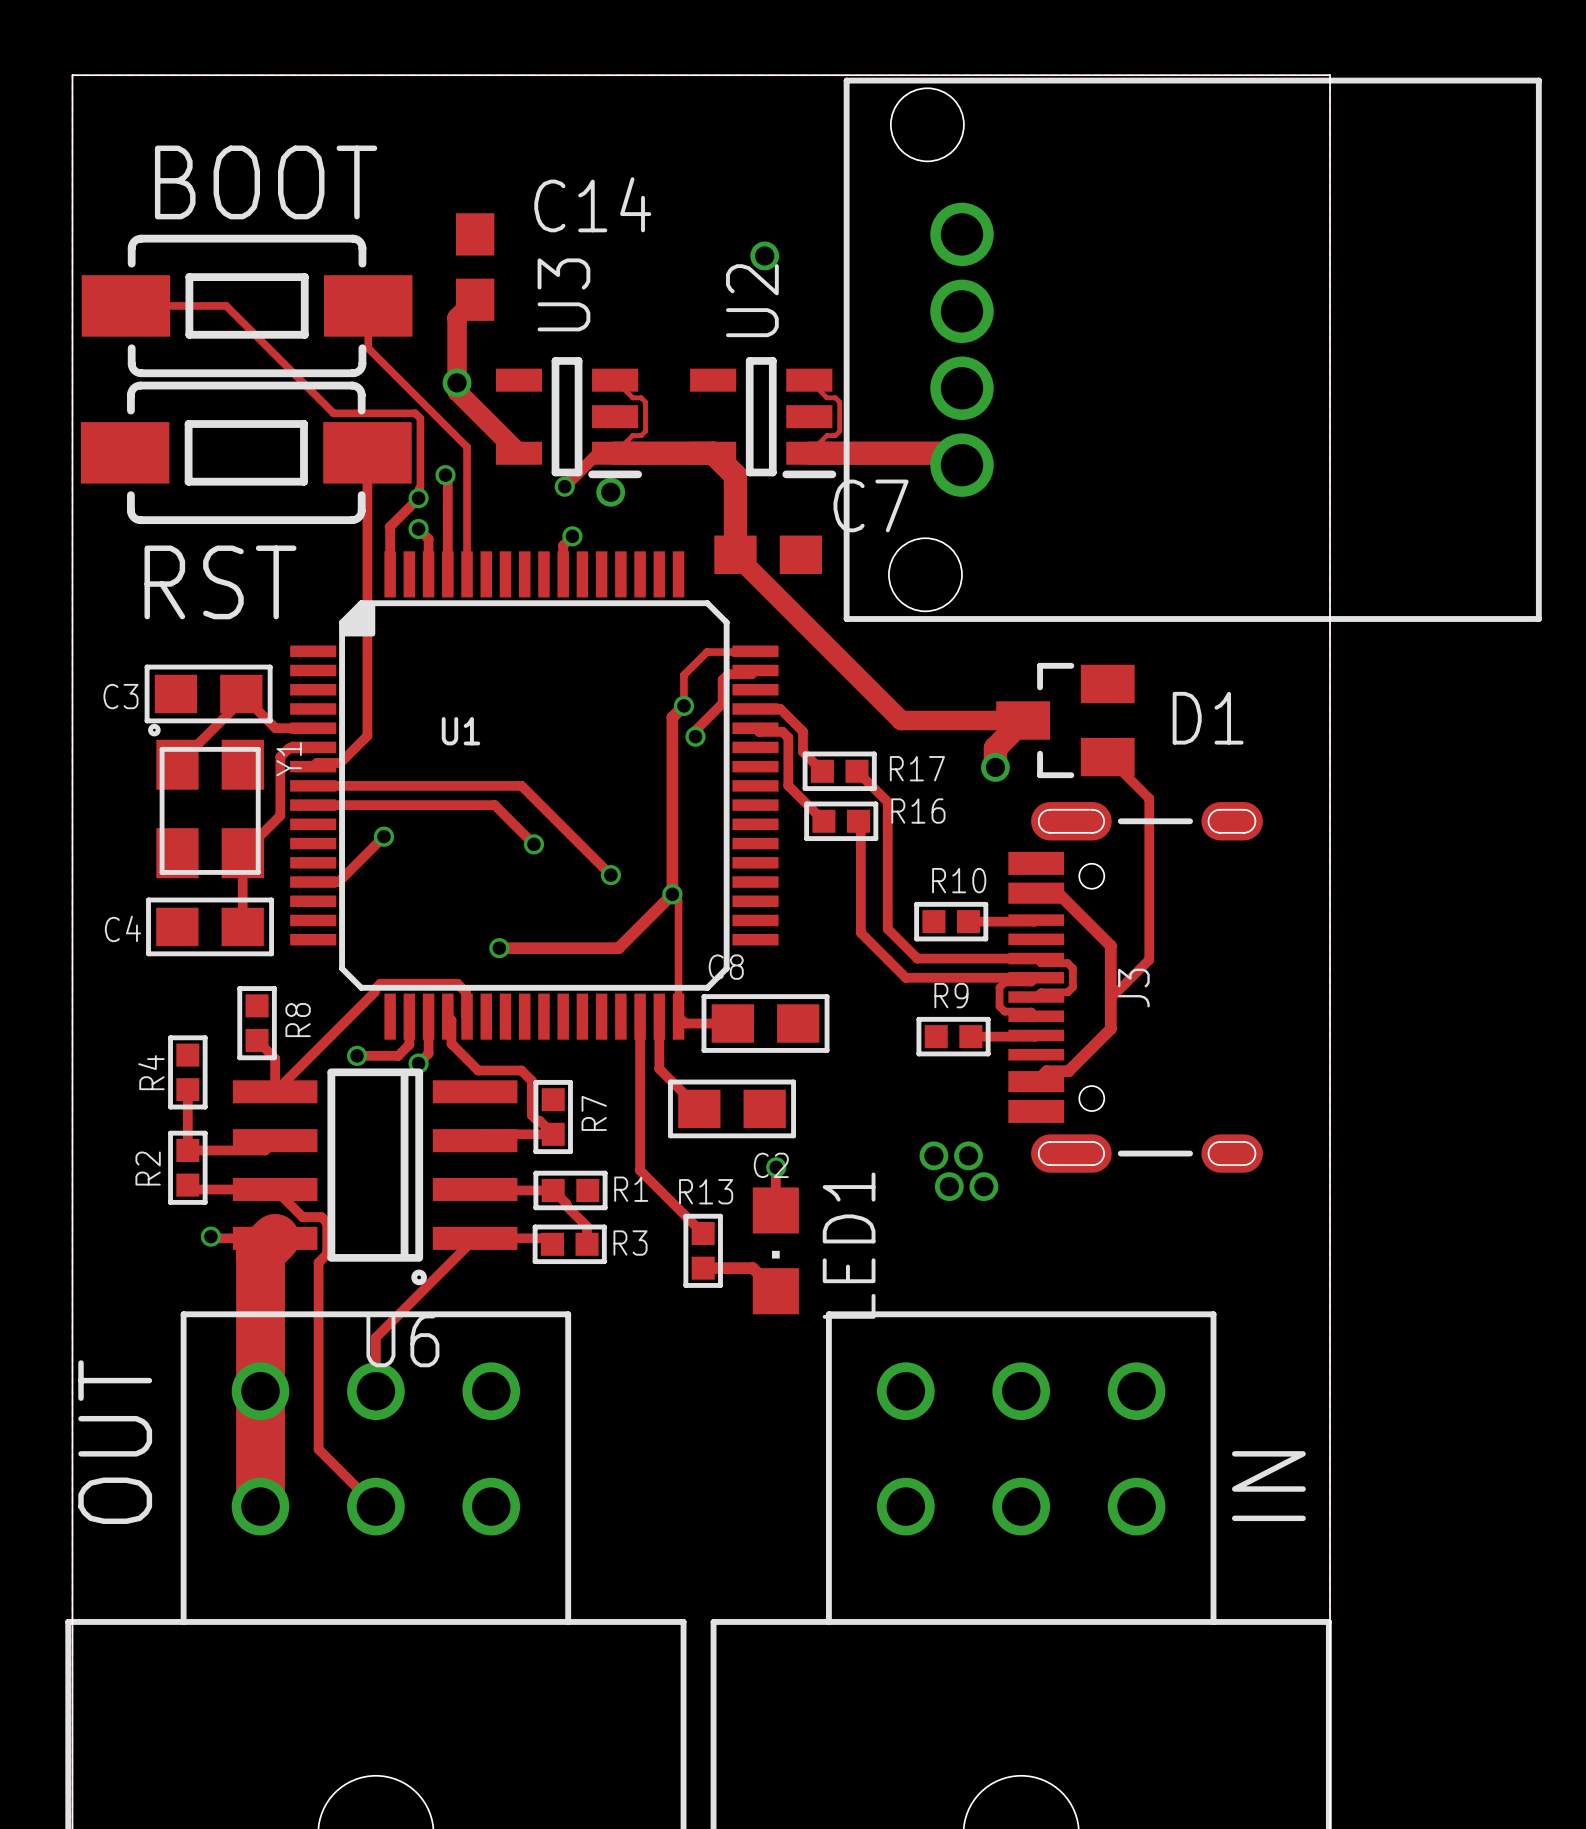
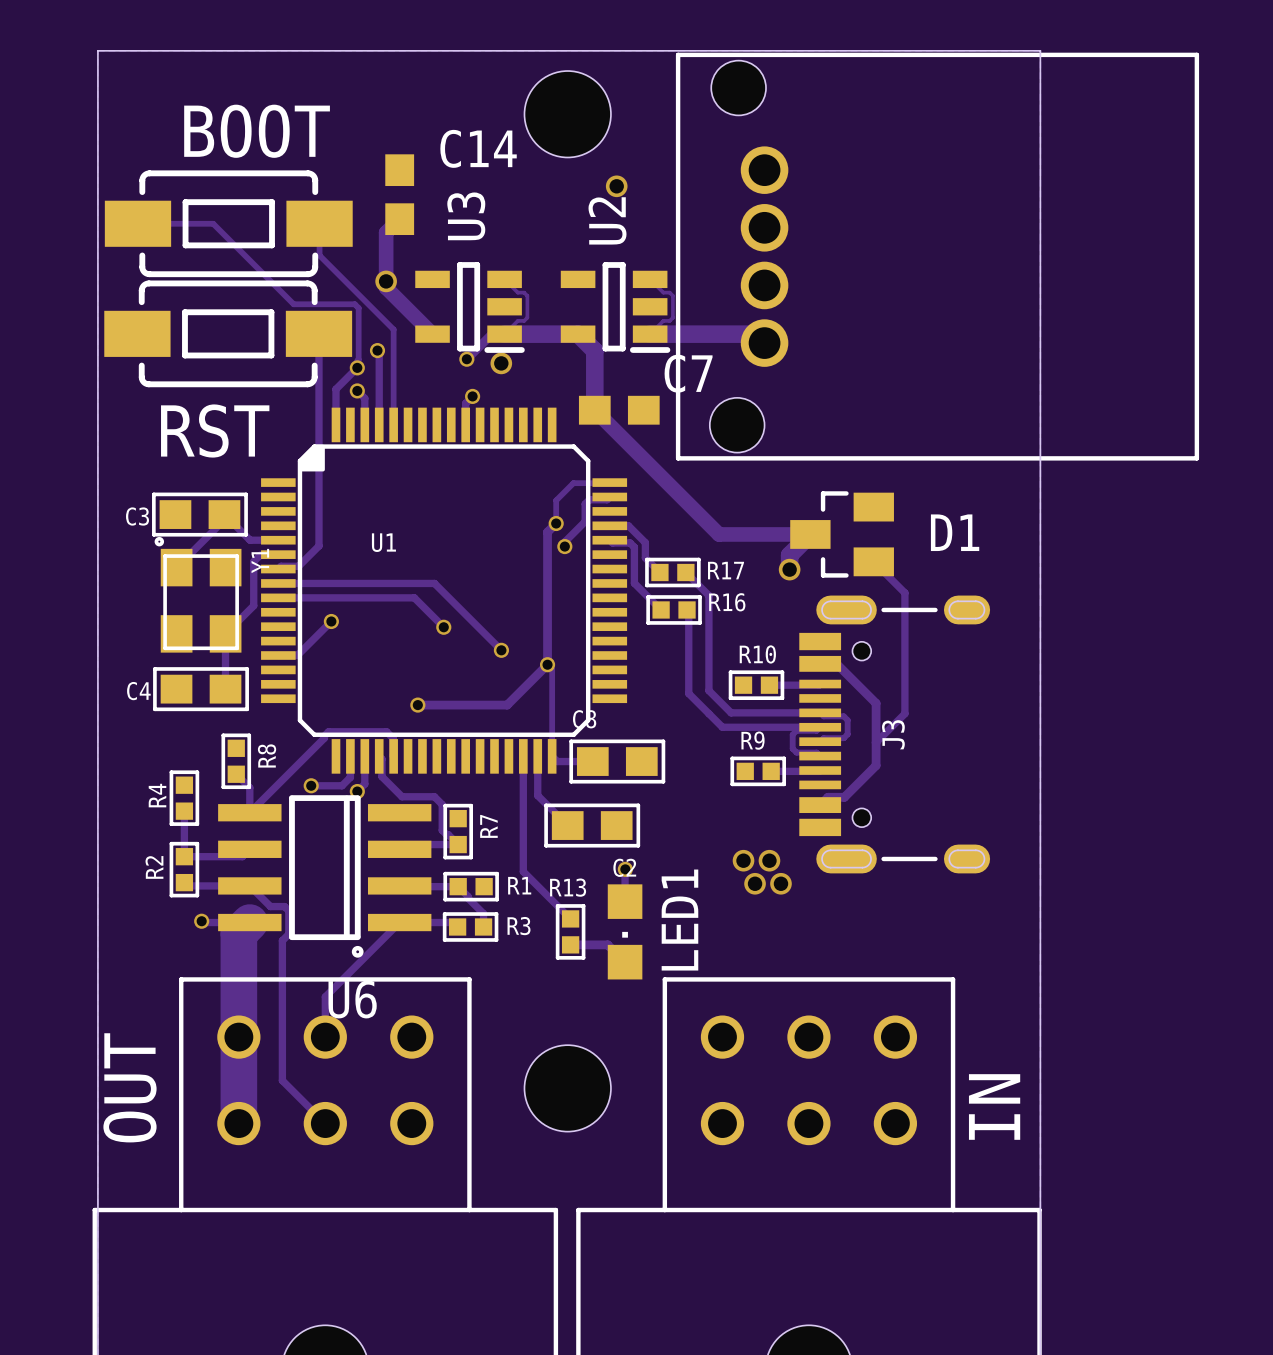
hole: none -> (567, 114)
hole: none -> (567, 1088)

